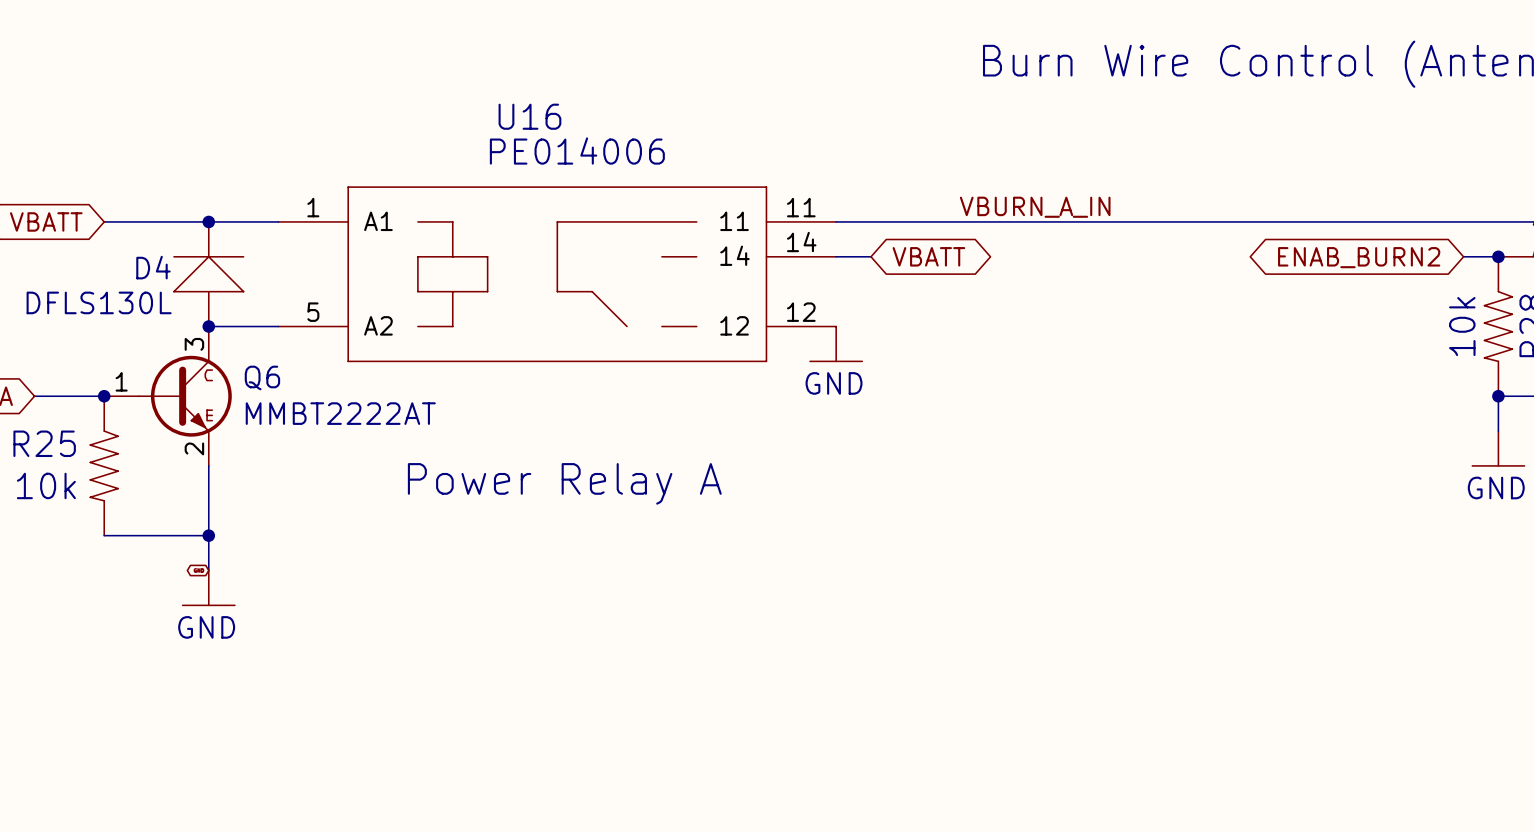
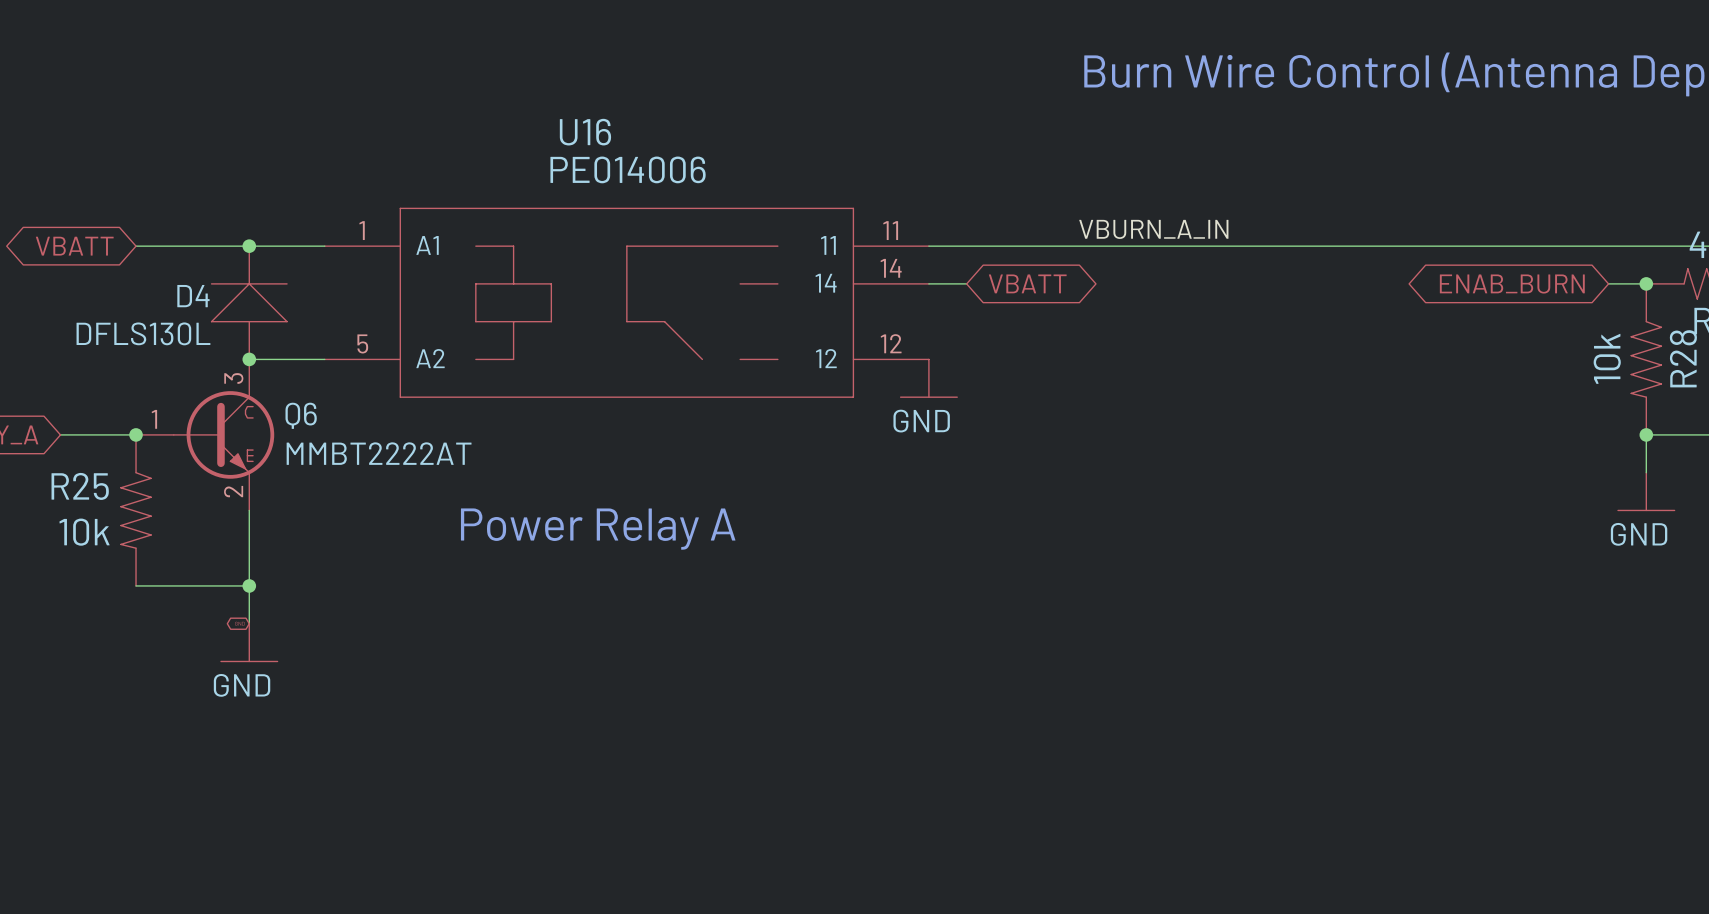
global label: ENAB_BURN2 (1359, 257) -> ENAB_BURN (1512, 284)

